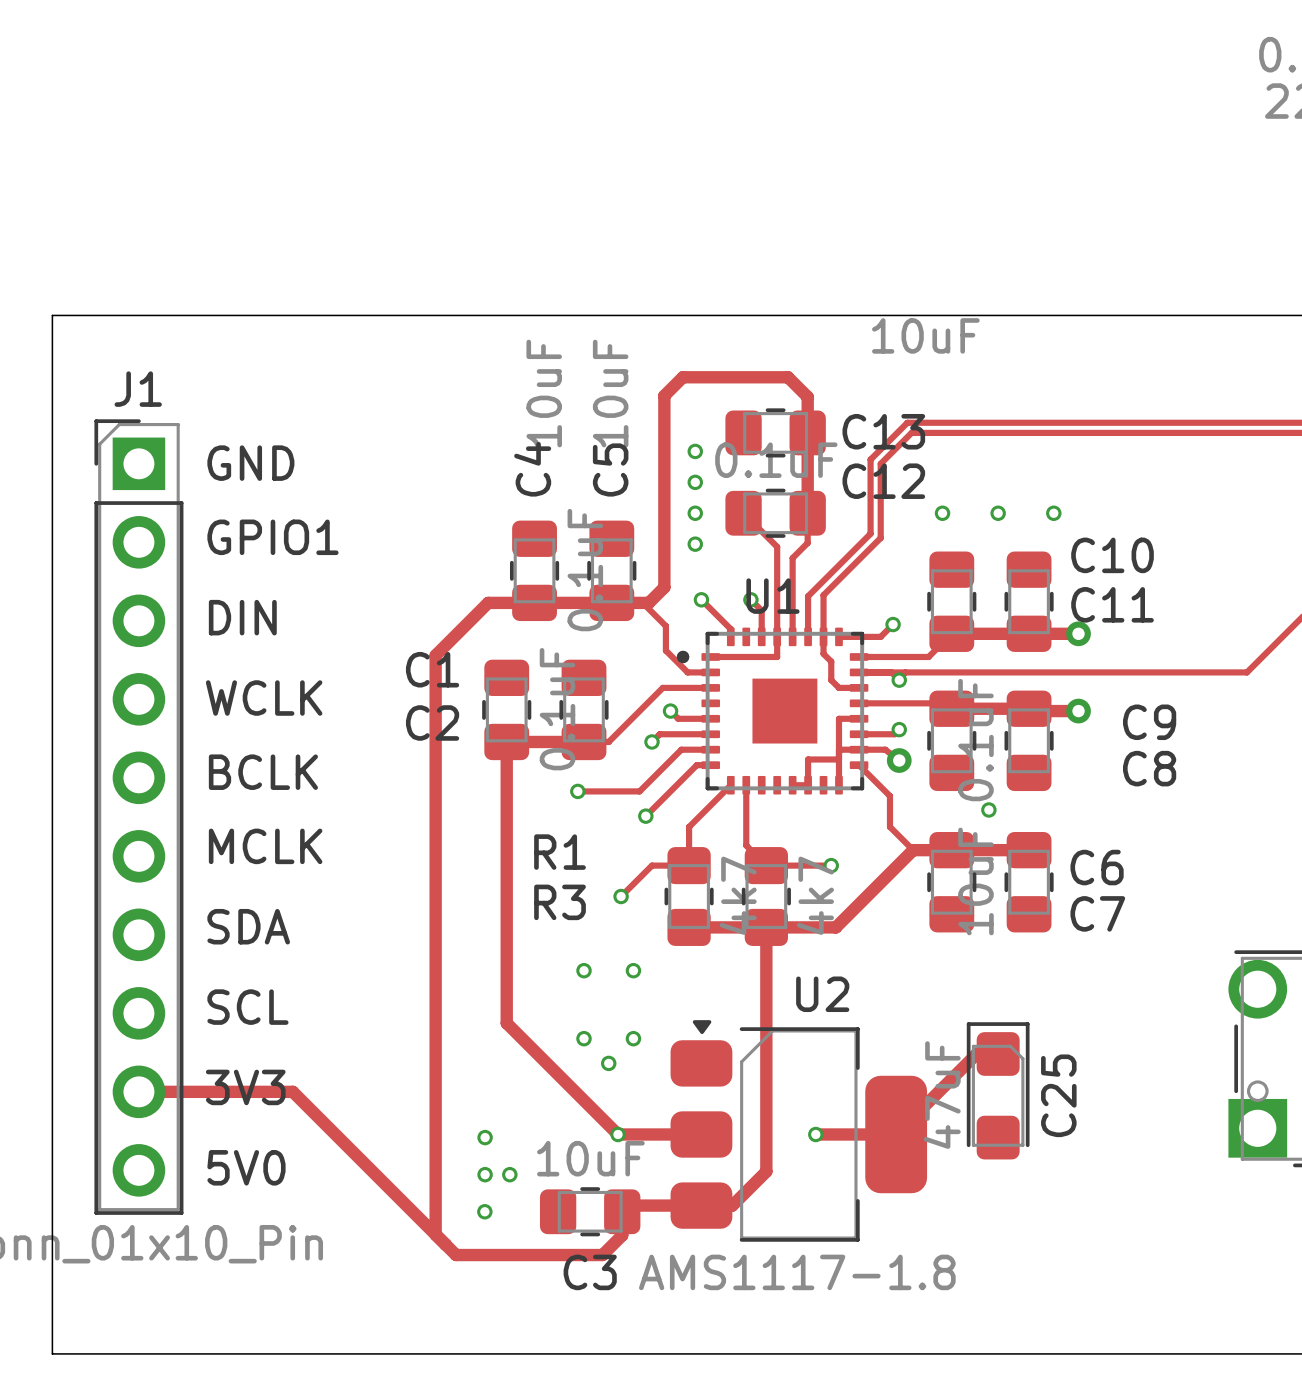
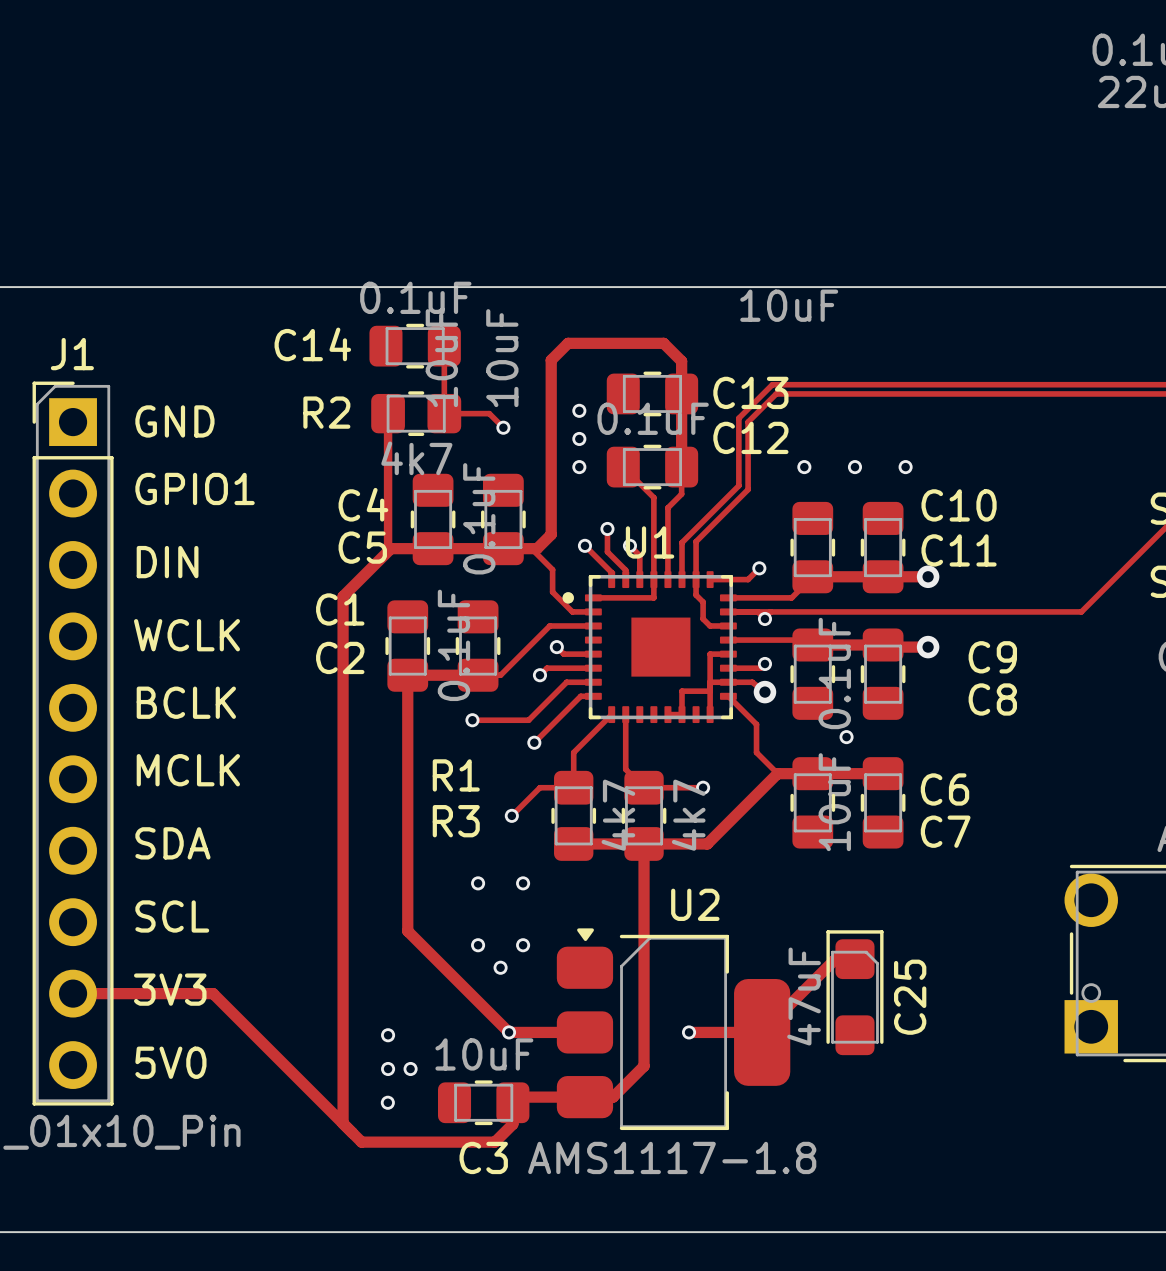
C14: none -> 0.1uF (415, 346)
track: none -> (444, 346) (444, 413) (489, 413) (503, 427)
track: none -> (388, 413) (388, 545) (390, 548)
R2: none -> 4k7 (416, 413)
C4 name rotation: 0° (532, 469) -> 90° clockwise (363, 504)
C4 name position: C4 (532, 469) -> C4 (363, 504)
C5 name rotation: 0° (610, 469) -> 90° clockwise (362, 547)
C5 name position: C5 (610, 469) -> C5 (362, 547)
via: none -> (503, 427)
via position: (695, 544) -> (607, 528)
track: none -> (607, 528) (607, 551) (625, 570) (625, 579)

